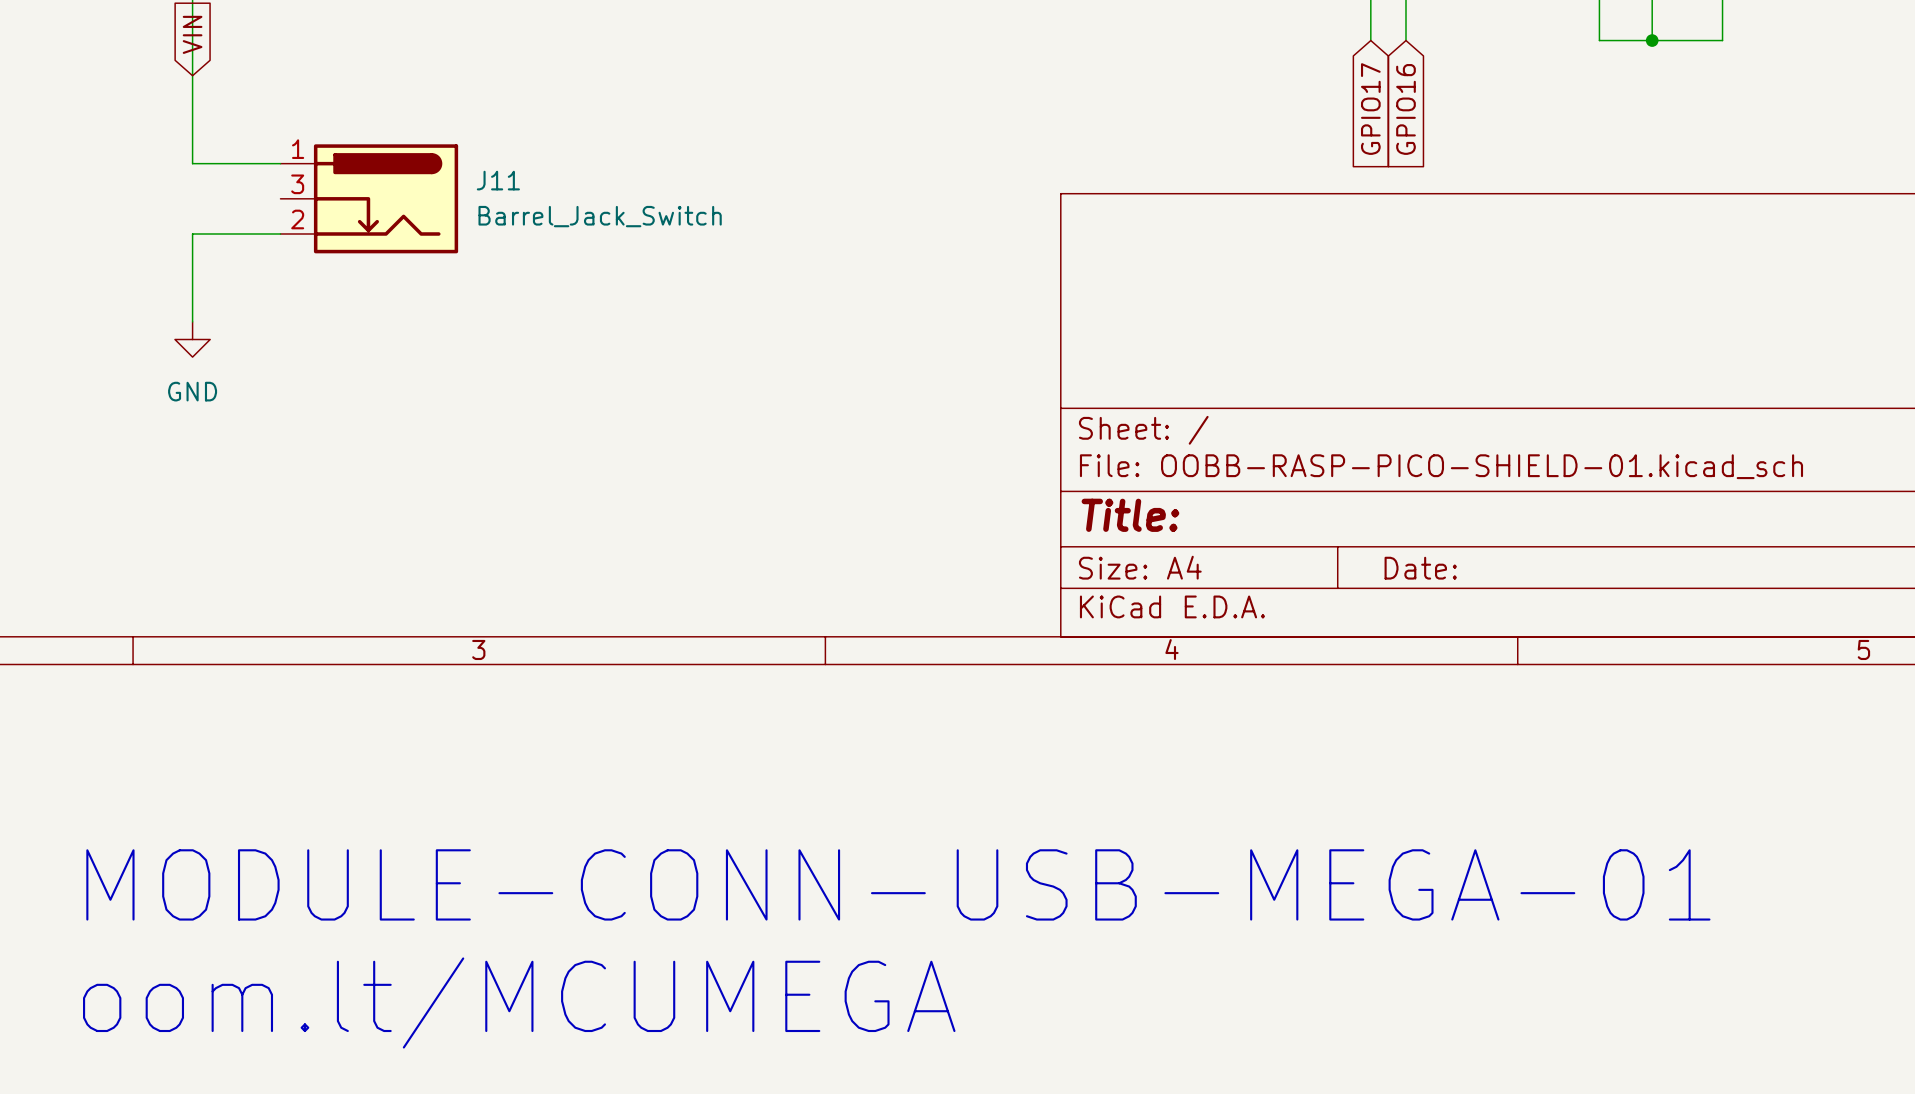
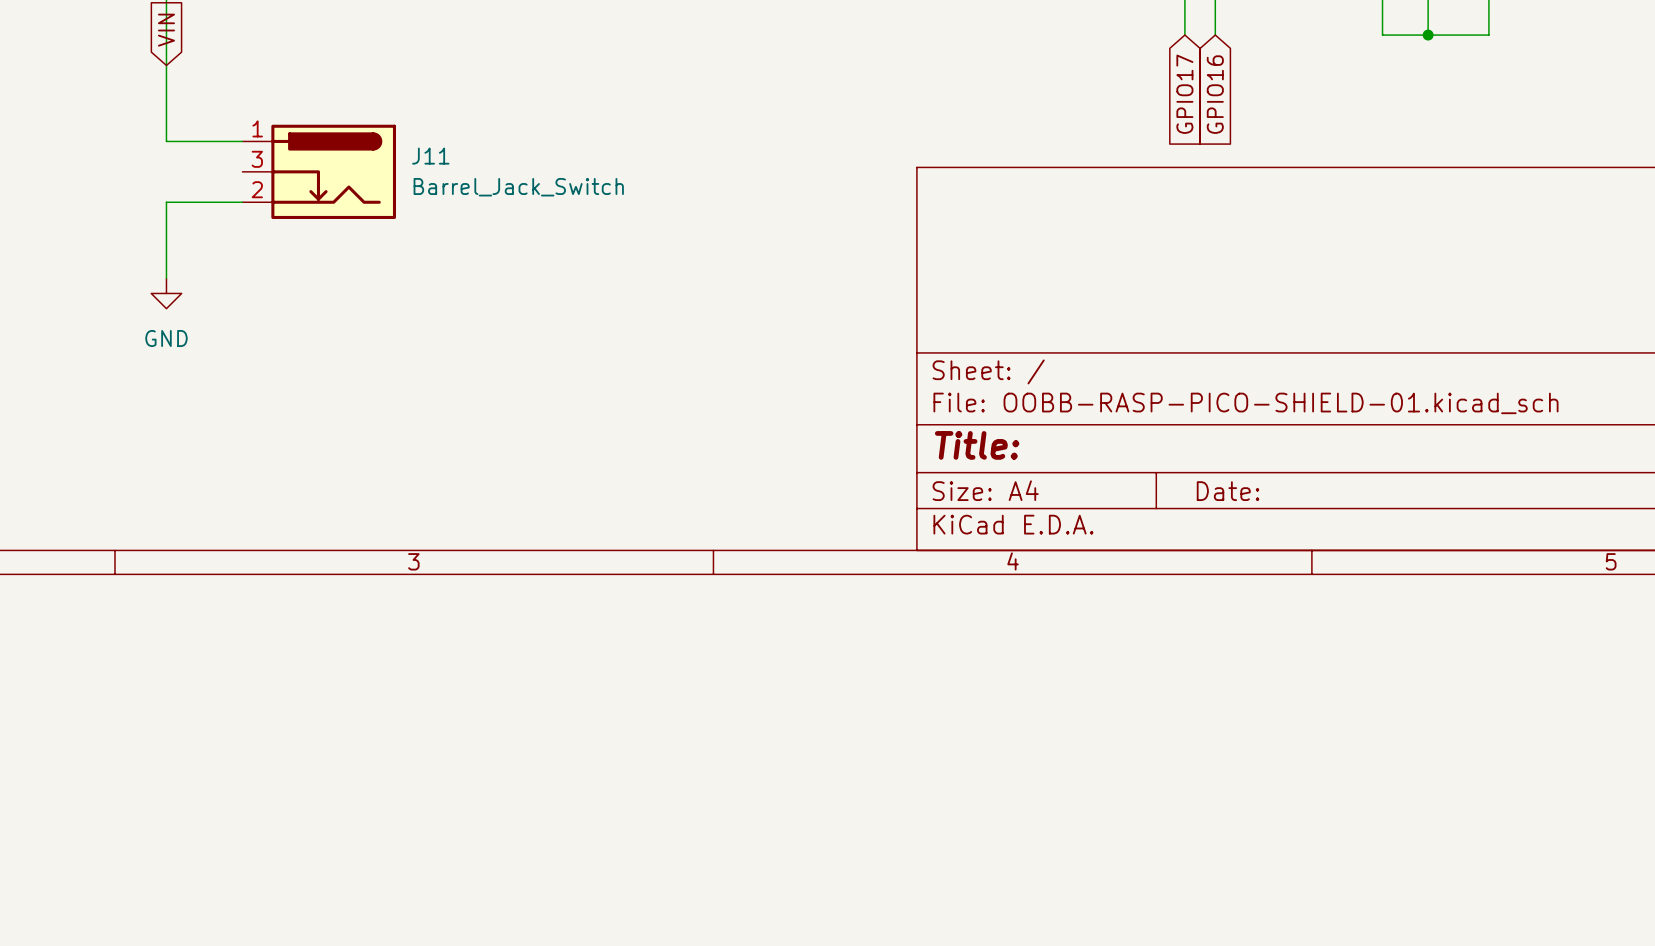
text: MODULE-CONN-USB-MEGA-01 (898, 884) -> none
text: oom.lt/MCUMEGA (519, 1002) -> none

